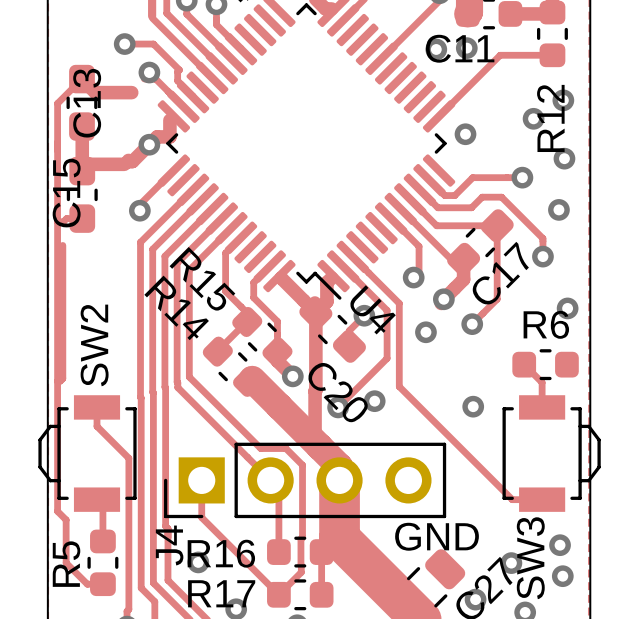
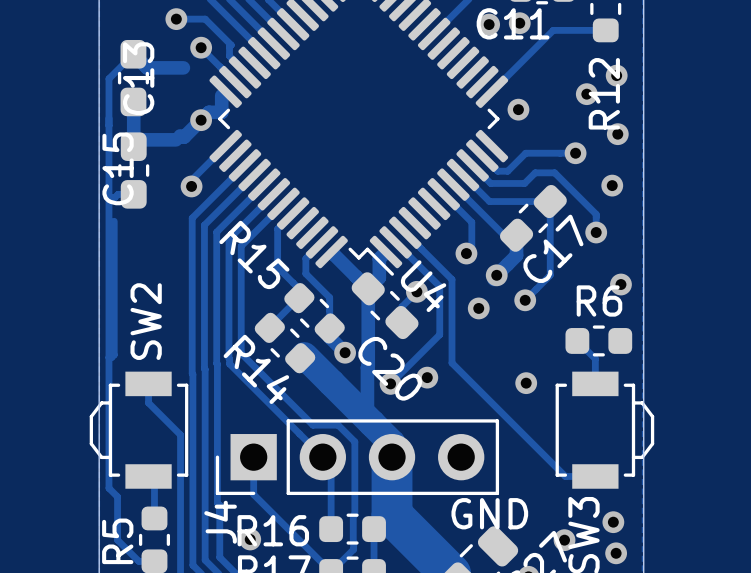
R14 name position: R14 (176, 307) -> R14 (256, 369)

